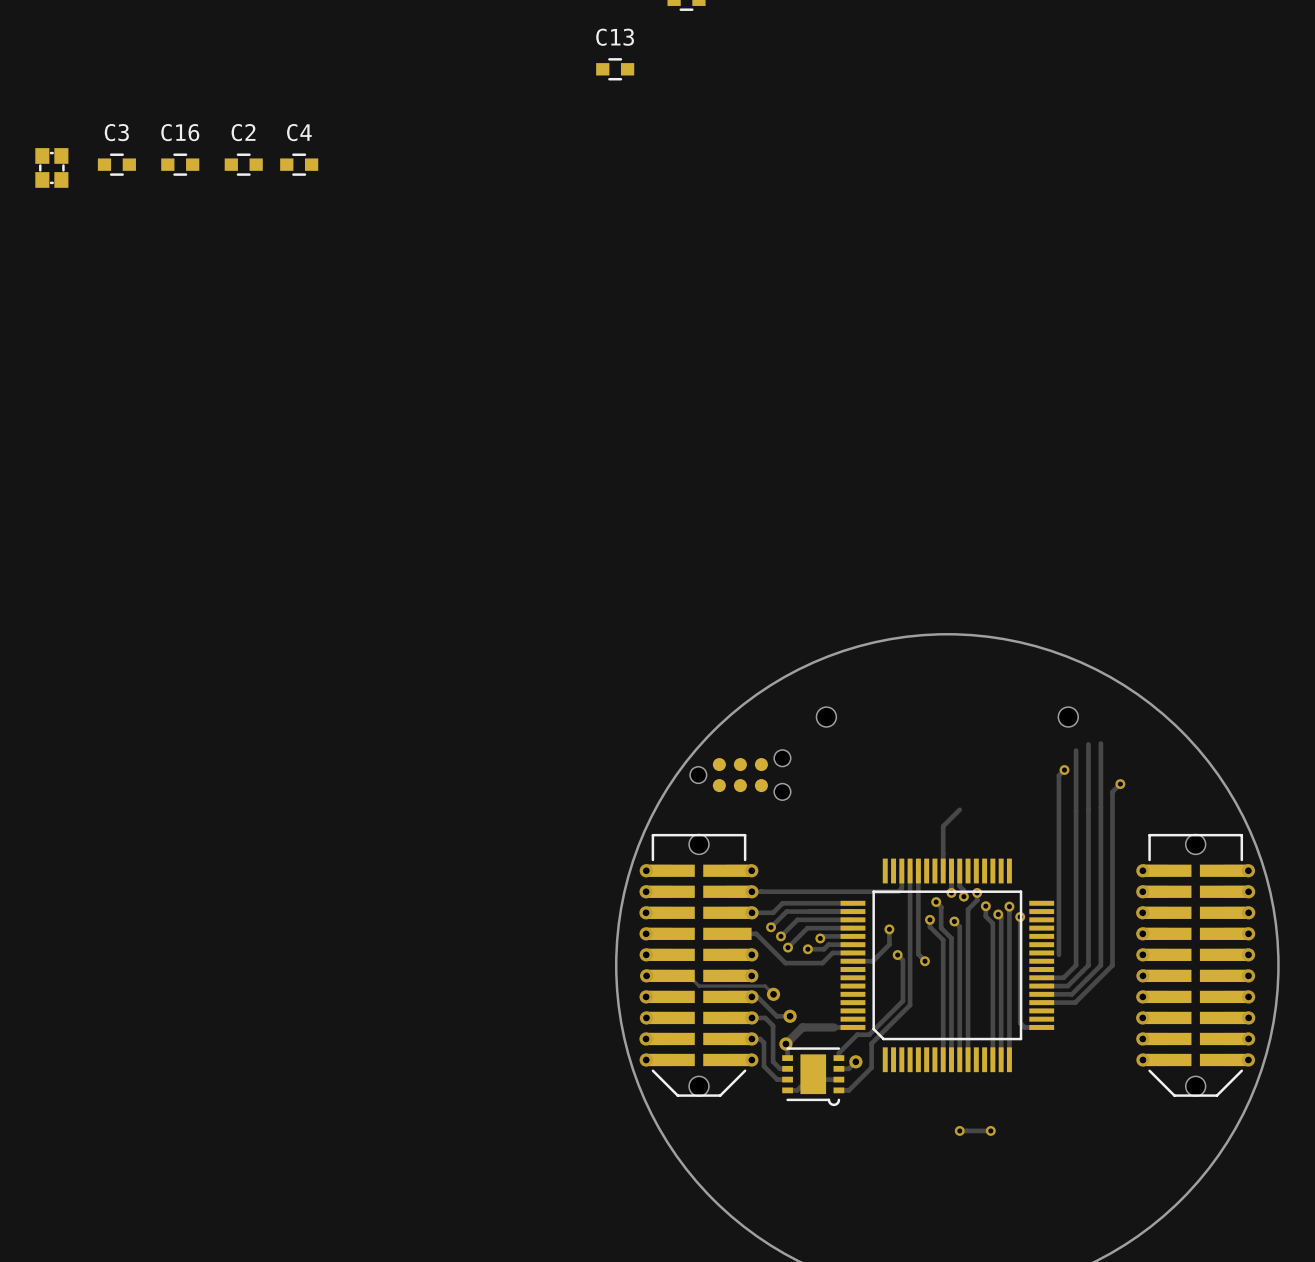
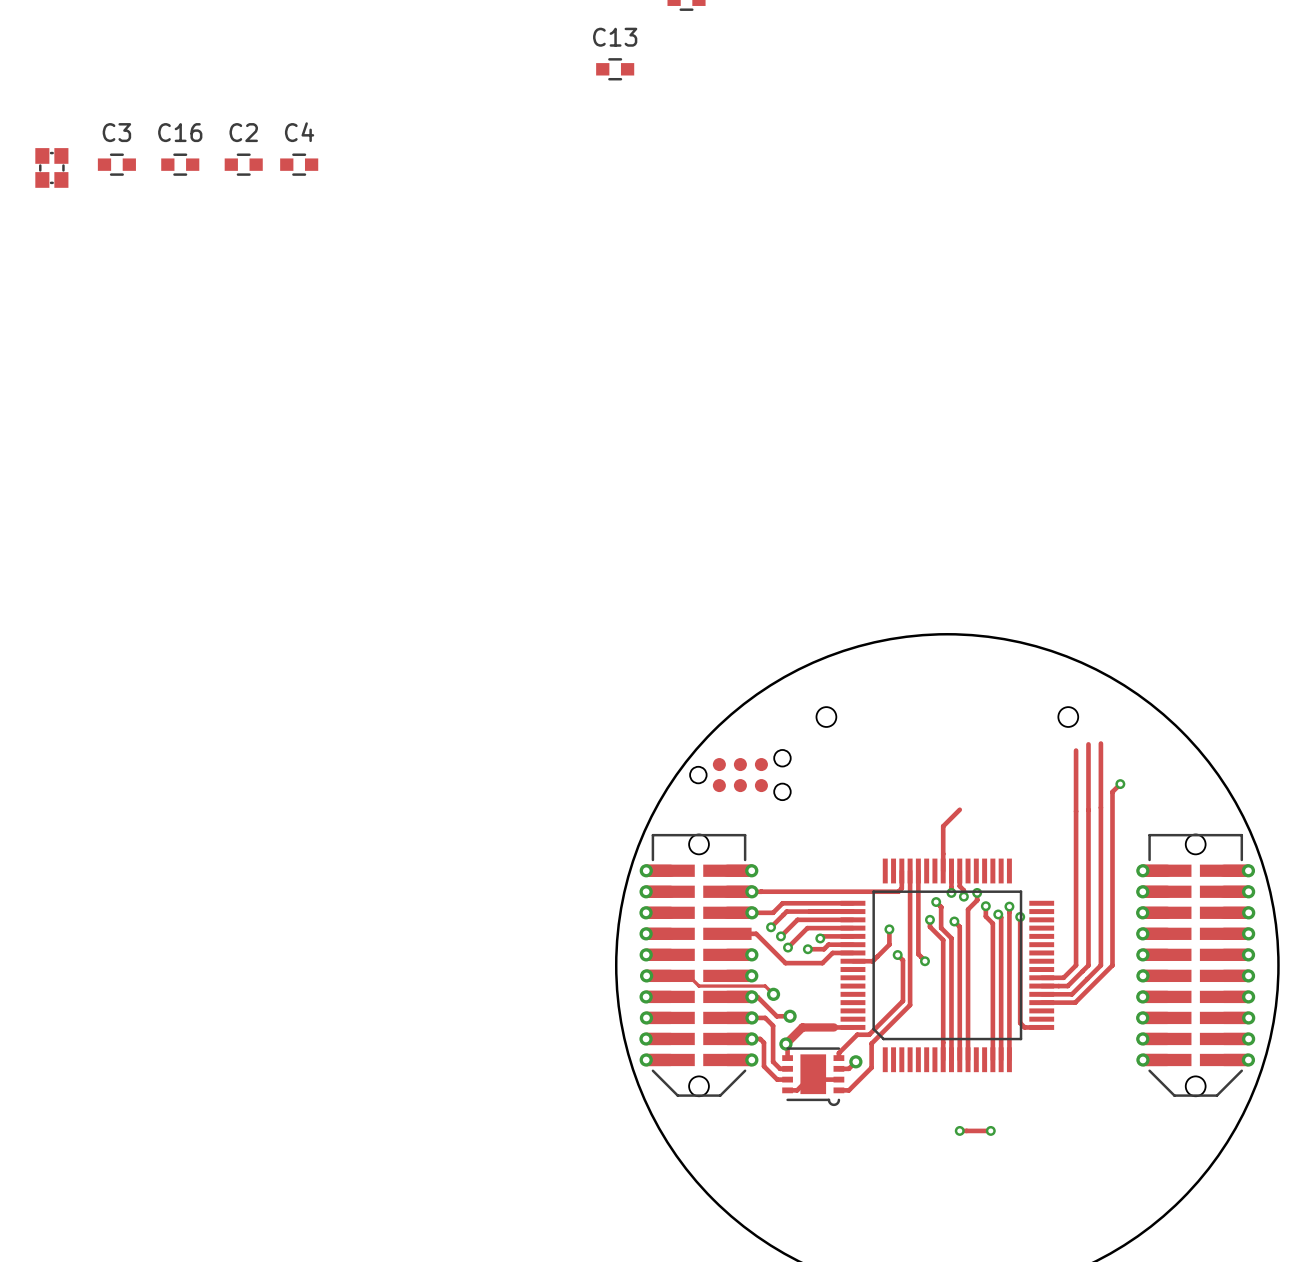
track: (1064, 770) (1058, 775) (1058, 954) -> none
via: (1064, 770) -> none

